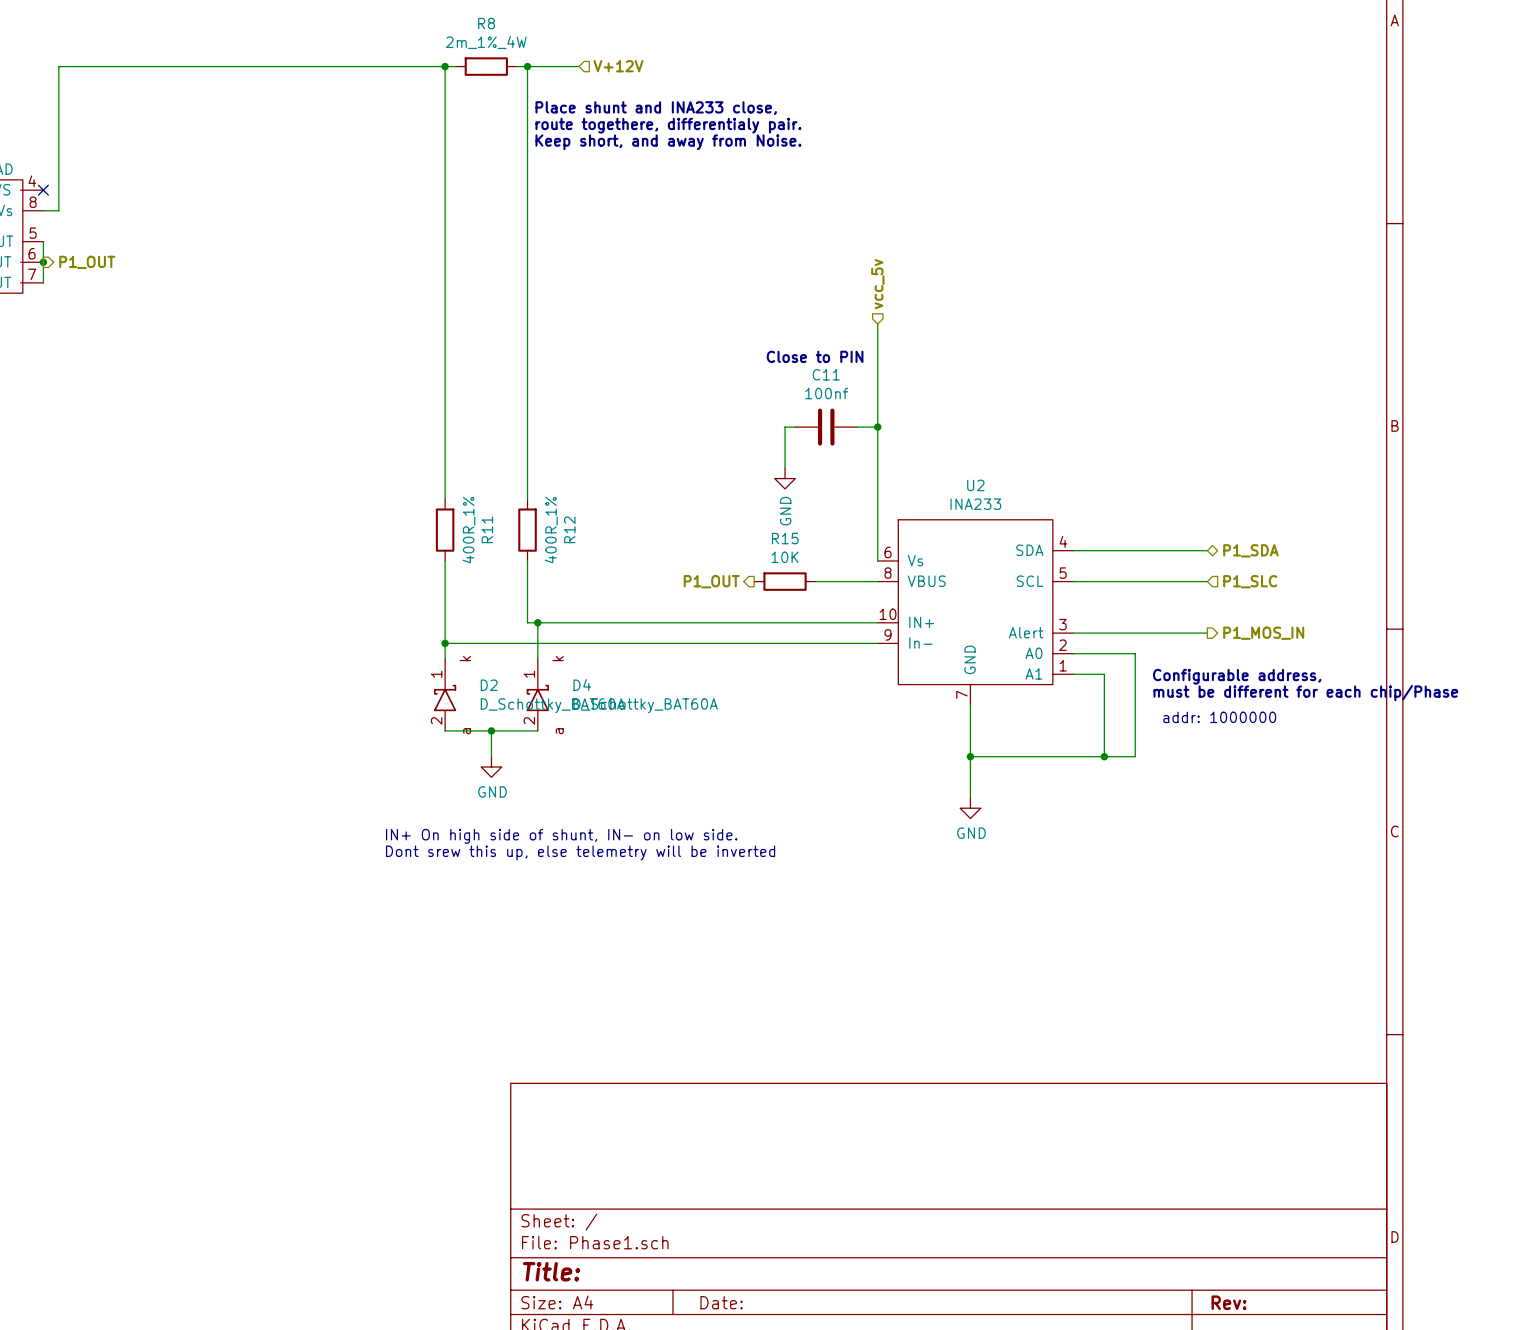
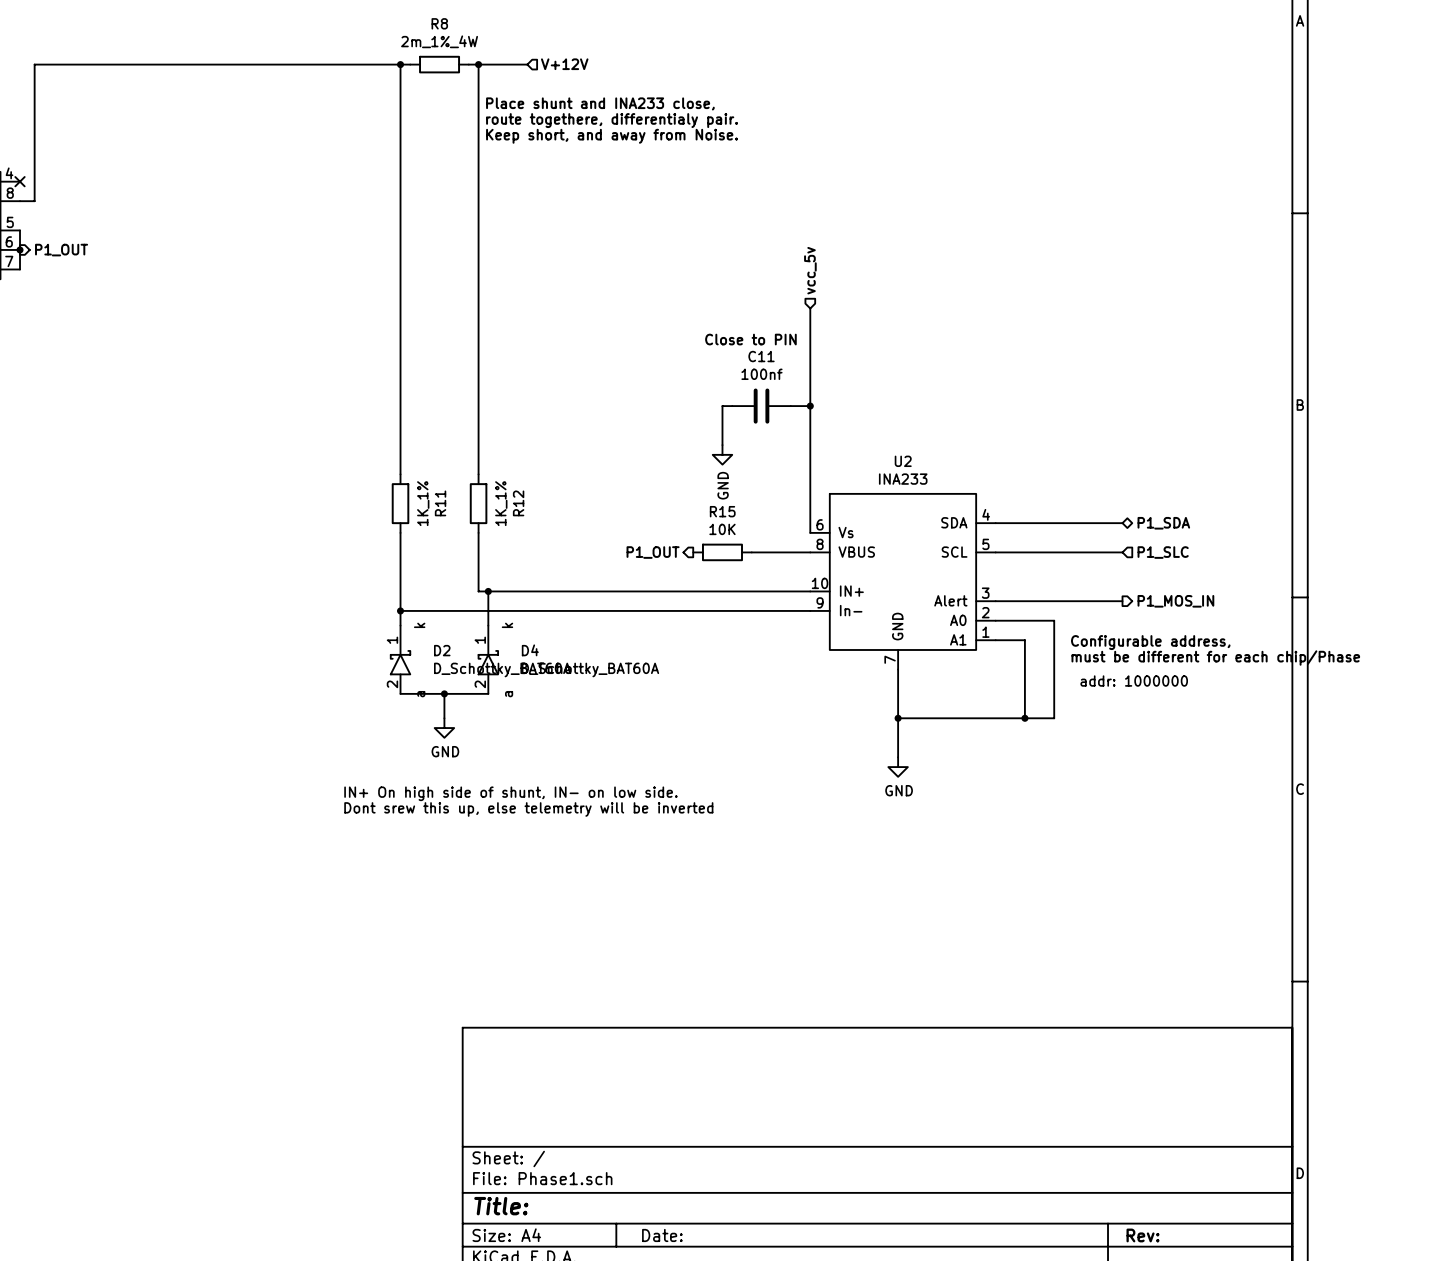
R11 value: 400R_1% (468, 530) -> 1K_1% (423, 503)
R12 value: 400R_1% (551, 530) -> 1K_1% (501, 503)

